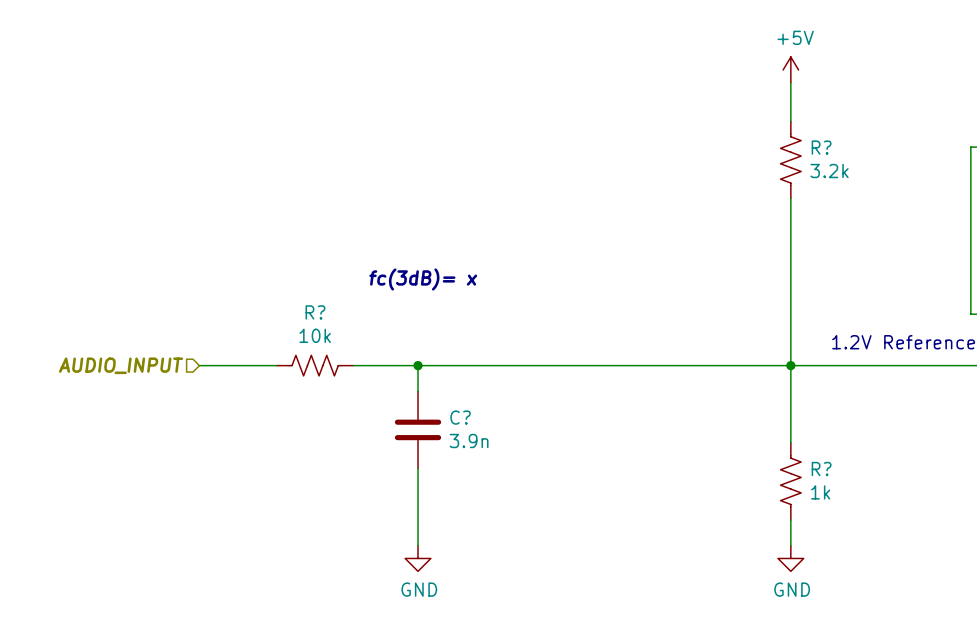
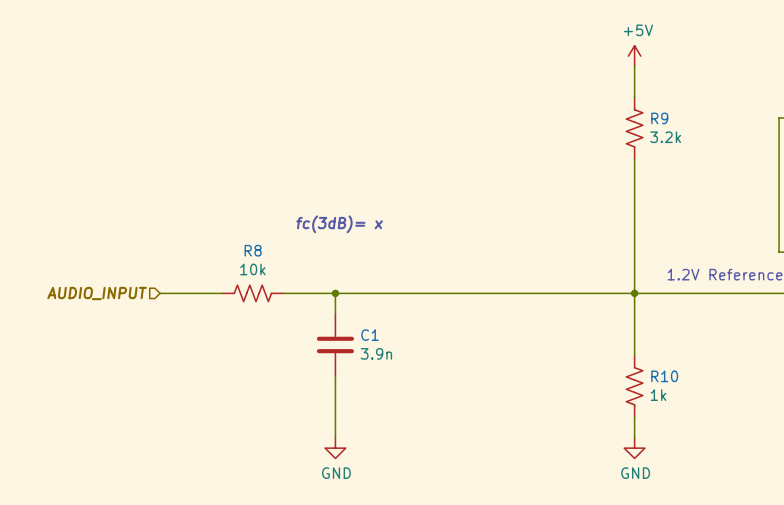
R? name: R? (821, 147) -> R9 (659, 118)
R? name: R? (315, 312) -> R8 (253, 250)
C? name: C? (460, 417) -> C1 (370, 335)
R? name: R? (821, 469) -> R10 (664, 376)

